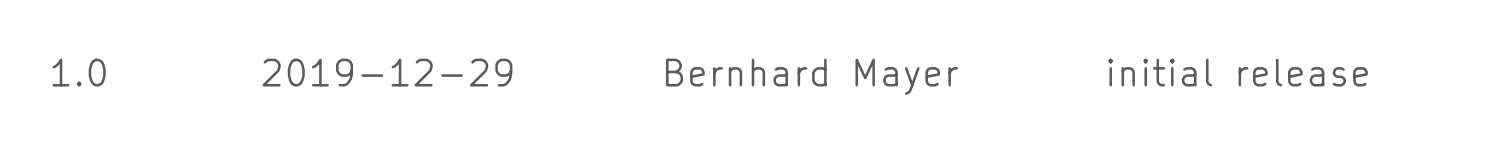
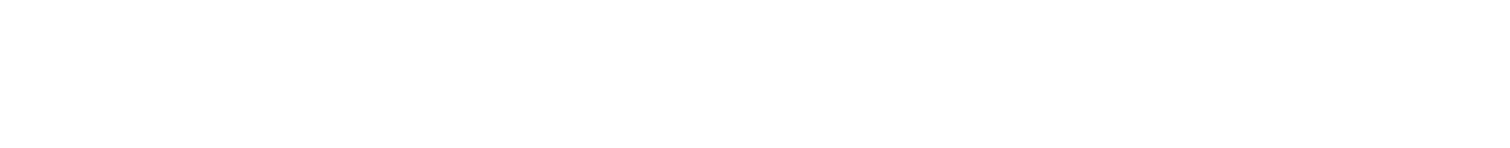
text: 1.0 (79, 72) -> none
text: 2019-12-29 (387, 72) -> none
text: initial release (1238, 72) -> none
text: Bernhard Mayer (812, 76) -> none

